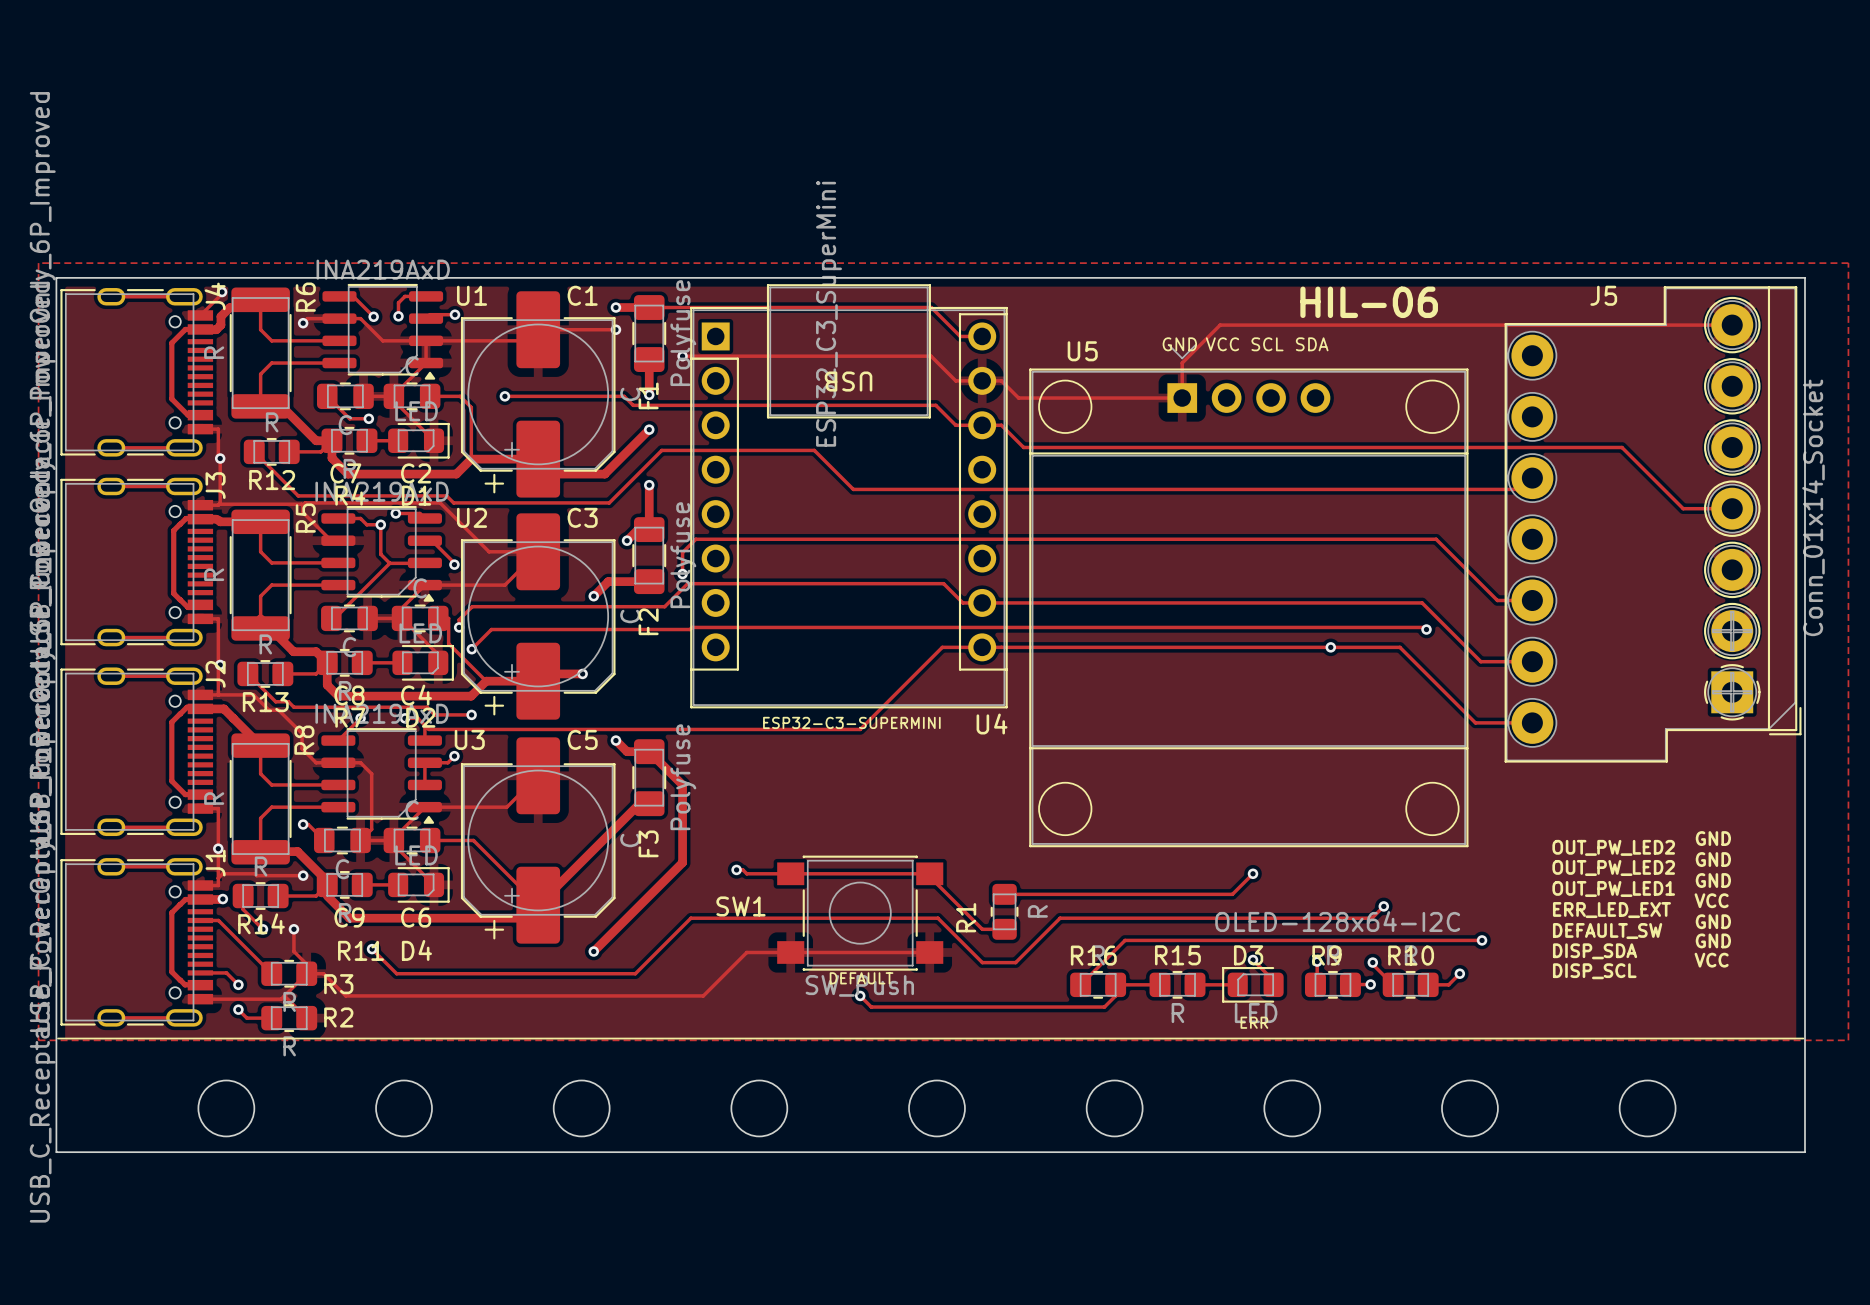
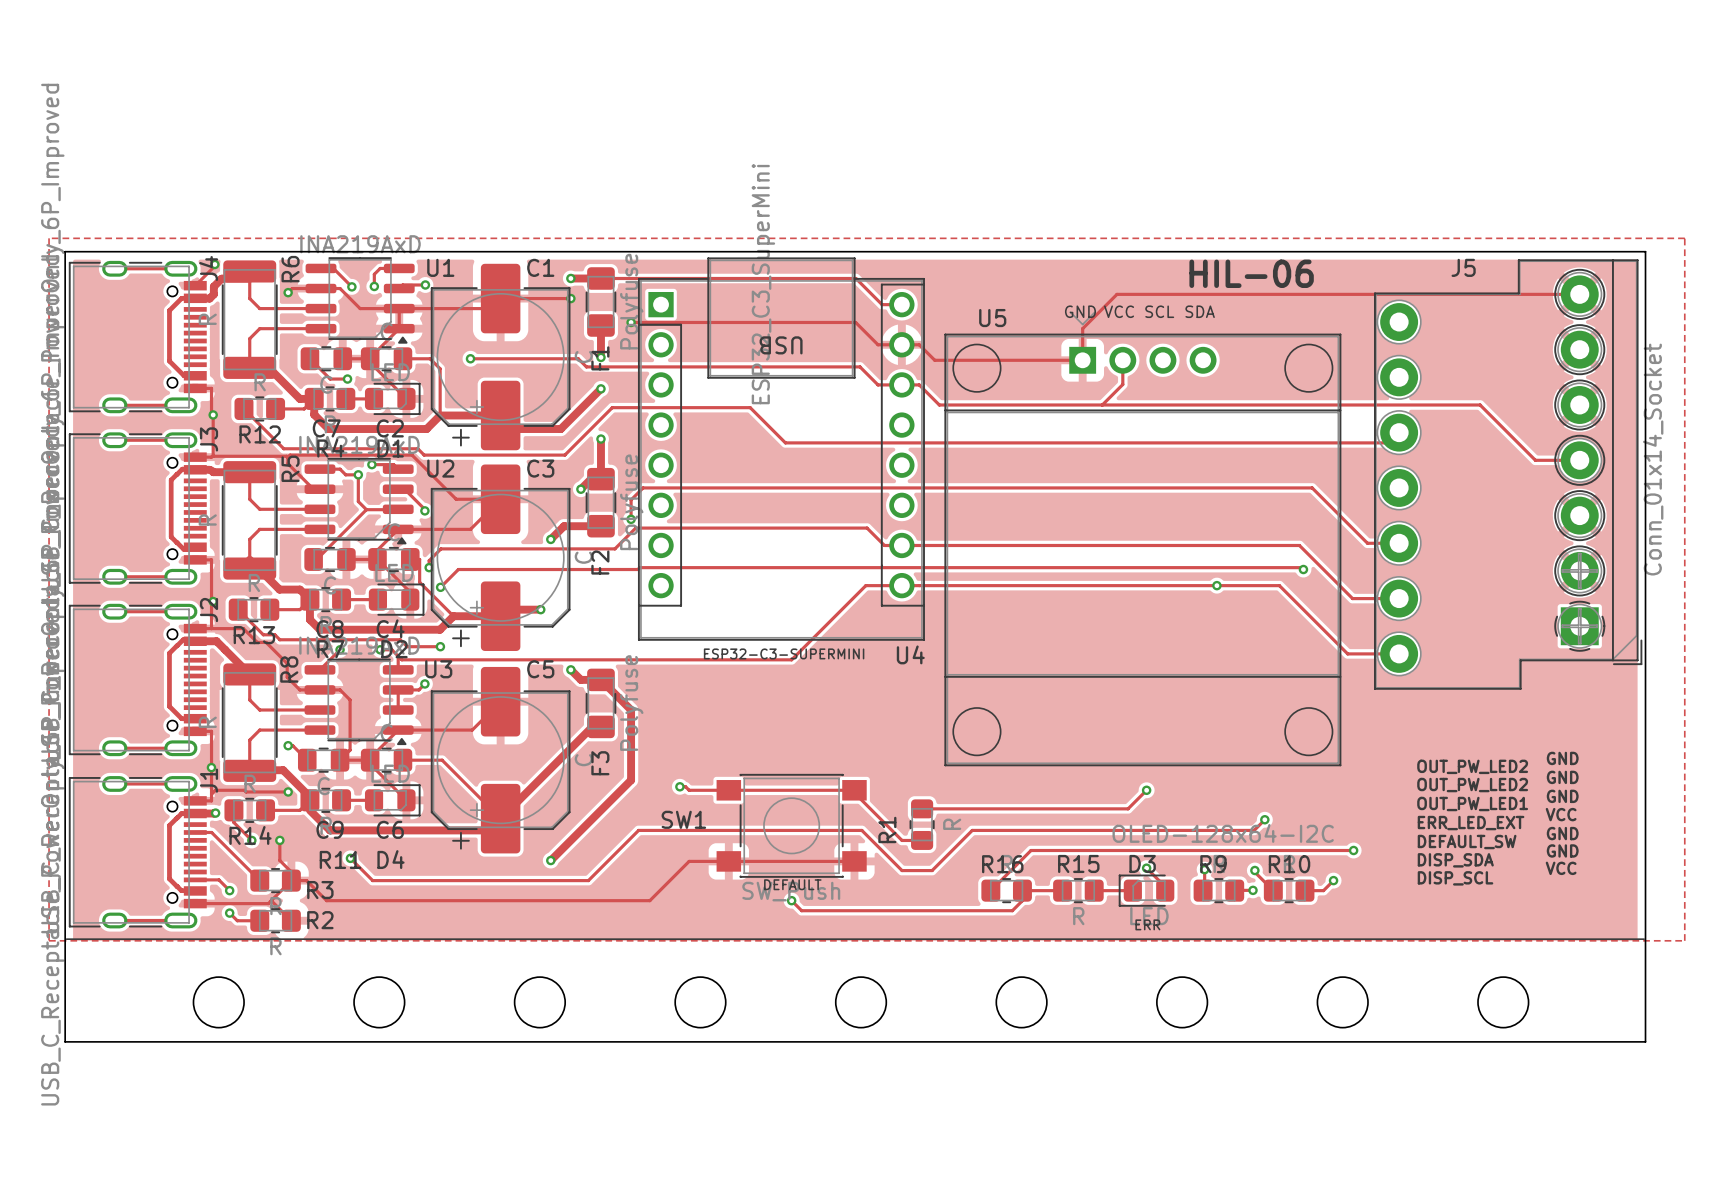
track: none -> (1122, 360) (1122, 384) (1102, 405)

